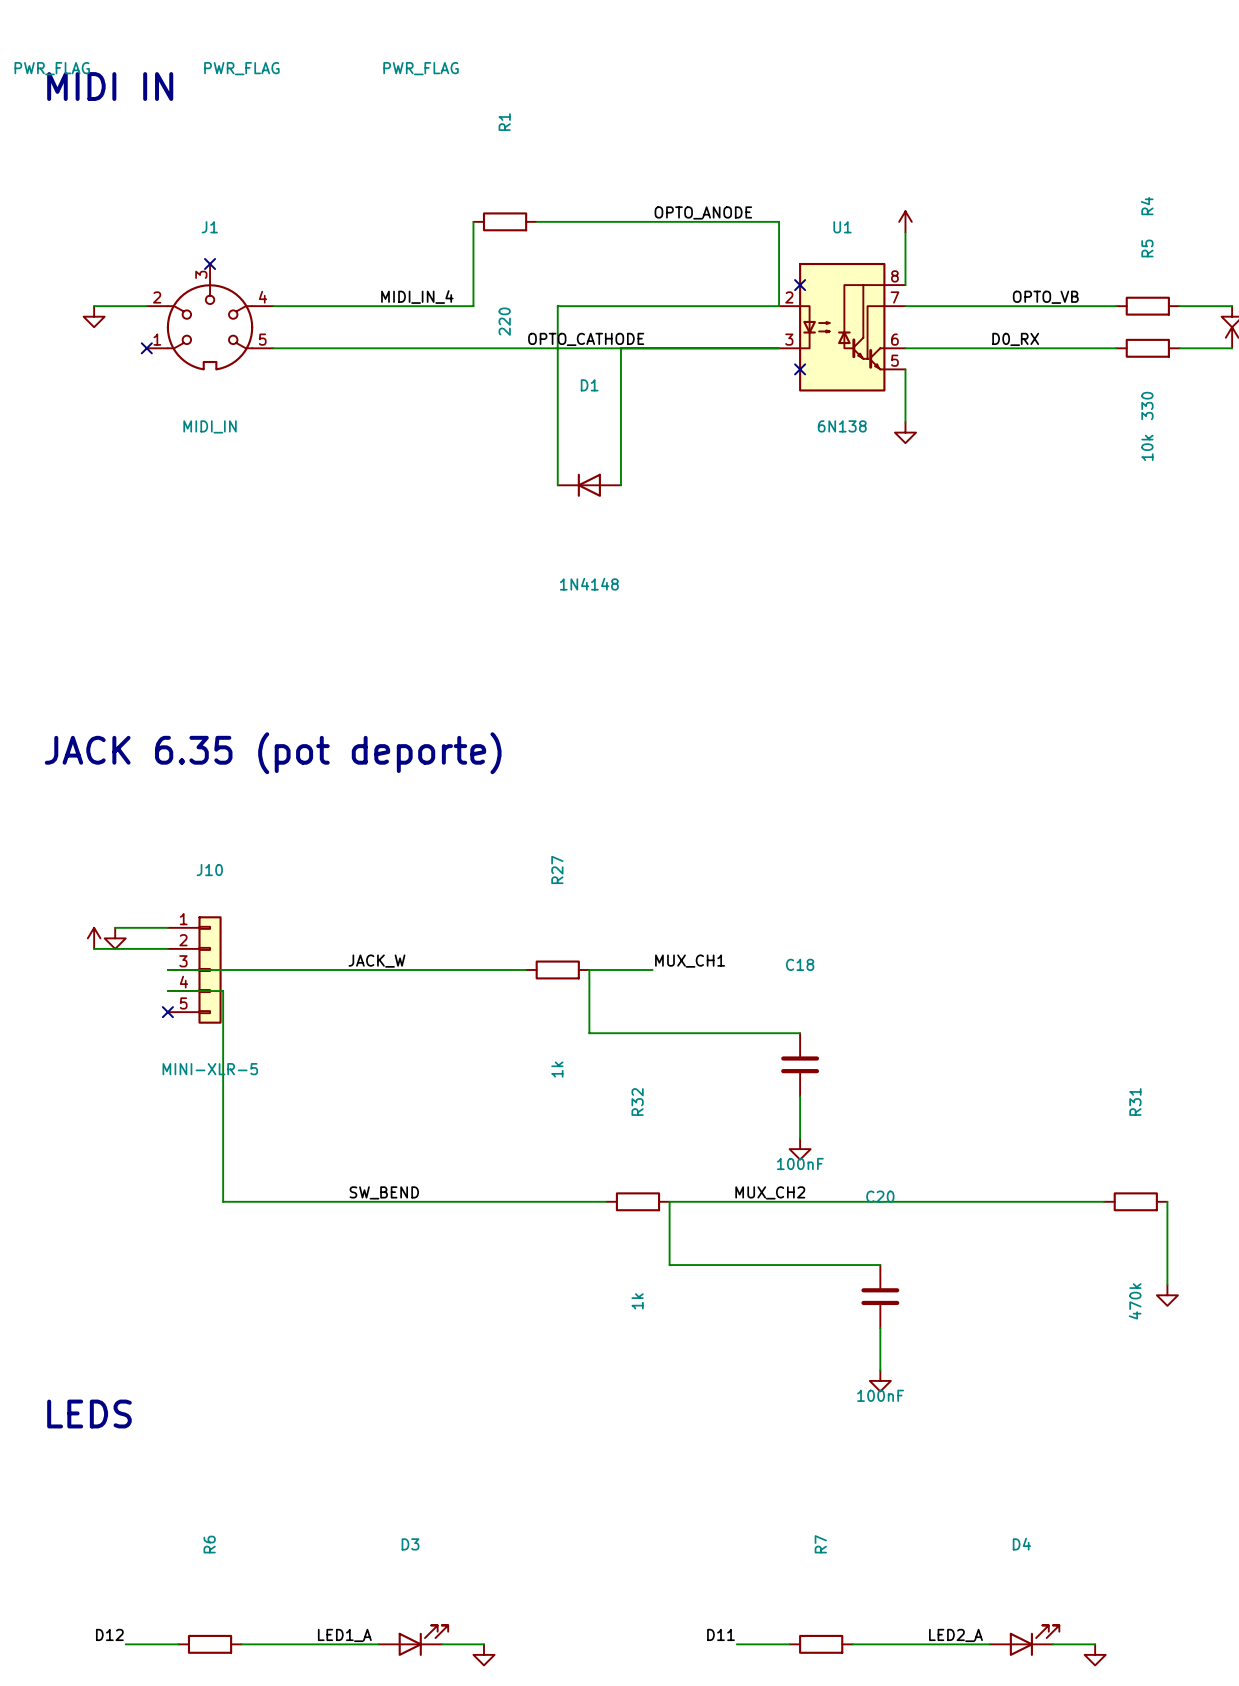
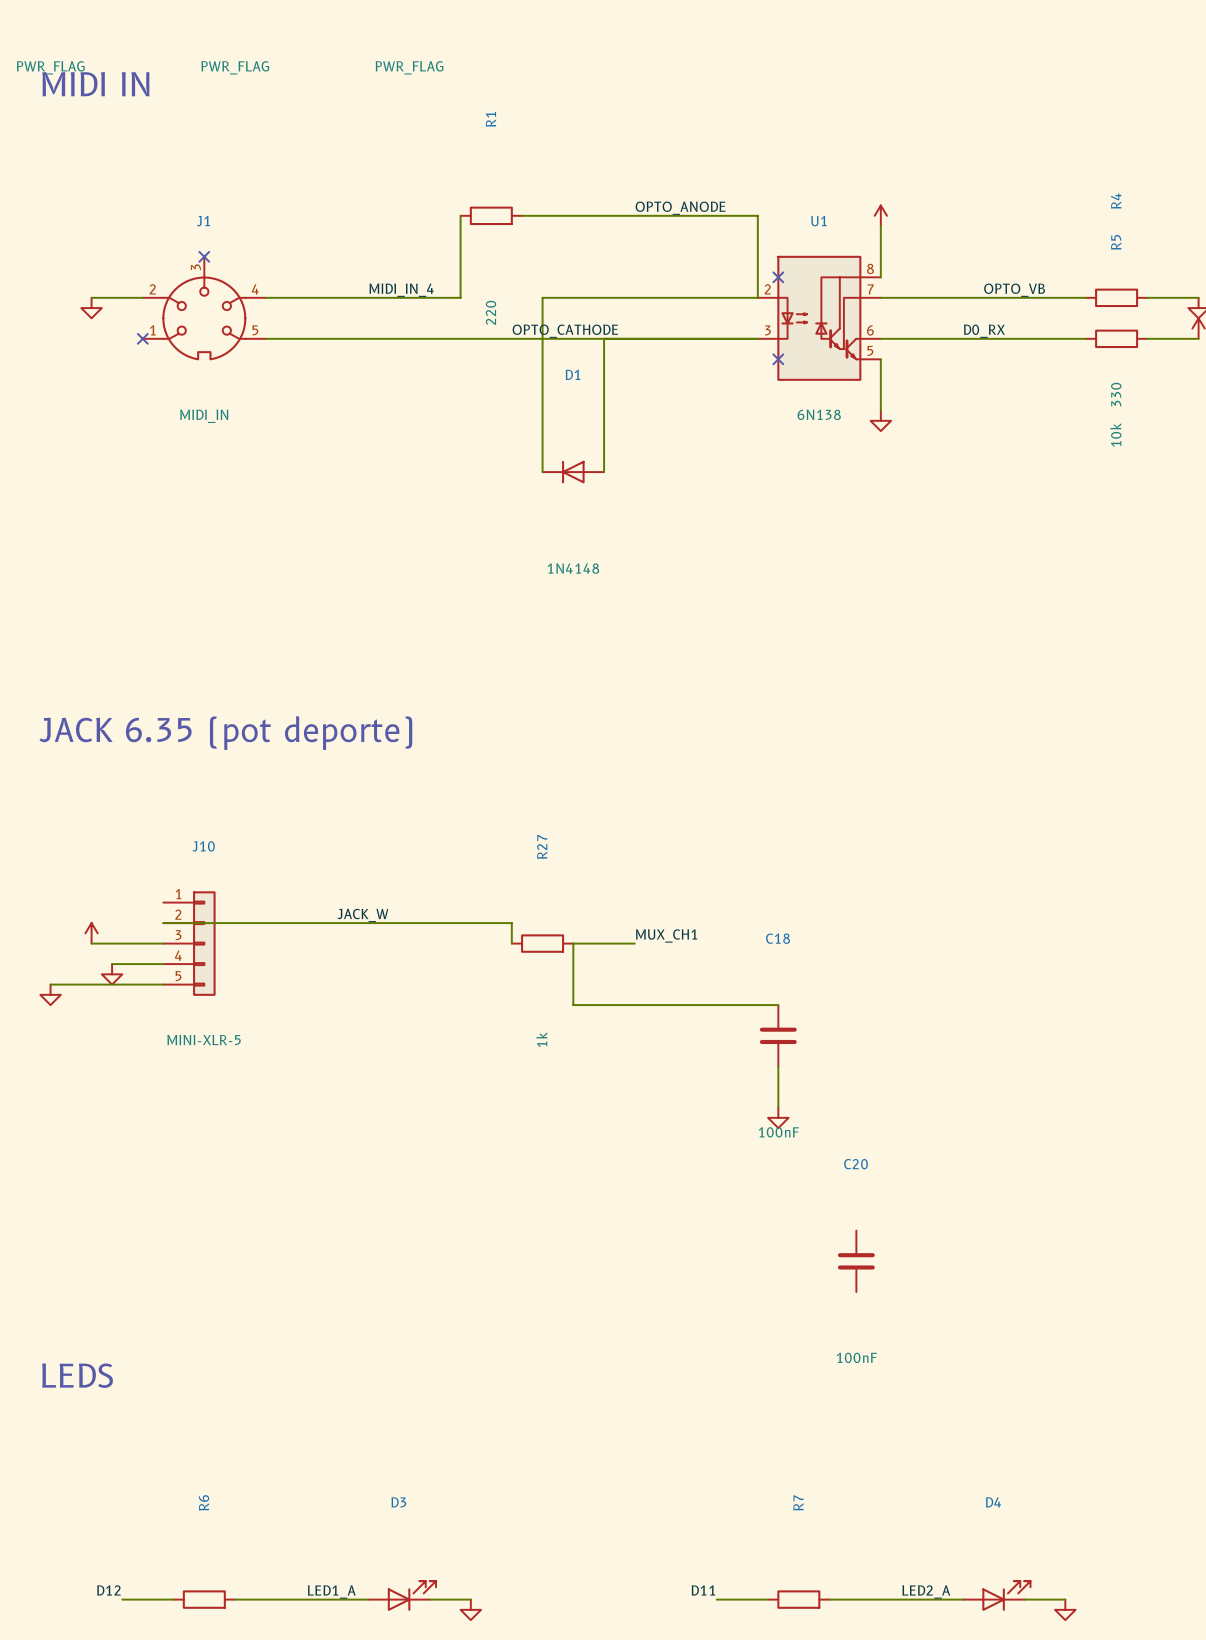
wire: (115, 927) (167, 927) -> none
power symbol position: (94, 938) -> (91, 933)
power symbol: (115, 938) -> none
wire: (94, 948) (167, 948) -> (91, 943) (163, 943)
label position: JACK_W (376, 961) -> JACK_W (362, 915)
wire: (167, 969) (526, 969) -> (163, 923) (511, 923) (511, 943)
wire: (167, 991) (223, 991) (223, 1201) (606, 1201) -> (163, 964) (112, 964)
power symbol: none -> (112, 974)
wire: none -> (50, 984) (163, 984)
no-connect mark: (167, 1012) -> none
power symbol: none -> (50, 994)
label: SW_BEND (384, 1192) -> none
label: MUX_CH2 (770, 1192) -> none
R32: 1k (637, 1201) -> none
wire: (1104, 1201) (669, 1201) (669, 1265) (880, 1265) -> none
R31: 470k (1135, 1201) -> none
wire: (1167, 1201) (1167, 1284) -> none
power symbol: (1167, 1295) -> none
wire: (880, 1328) (880, 1370) -> none
power symbol: (880, 1380) -> none

